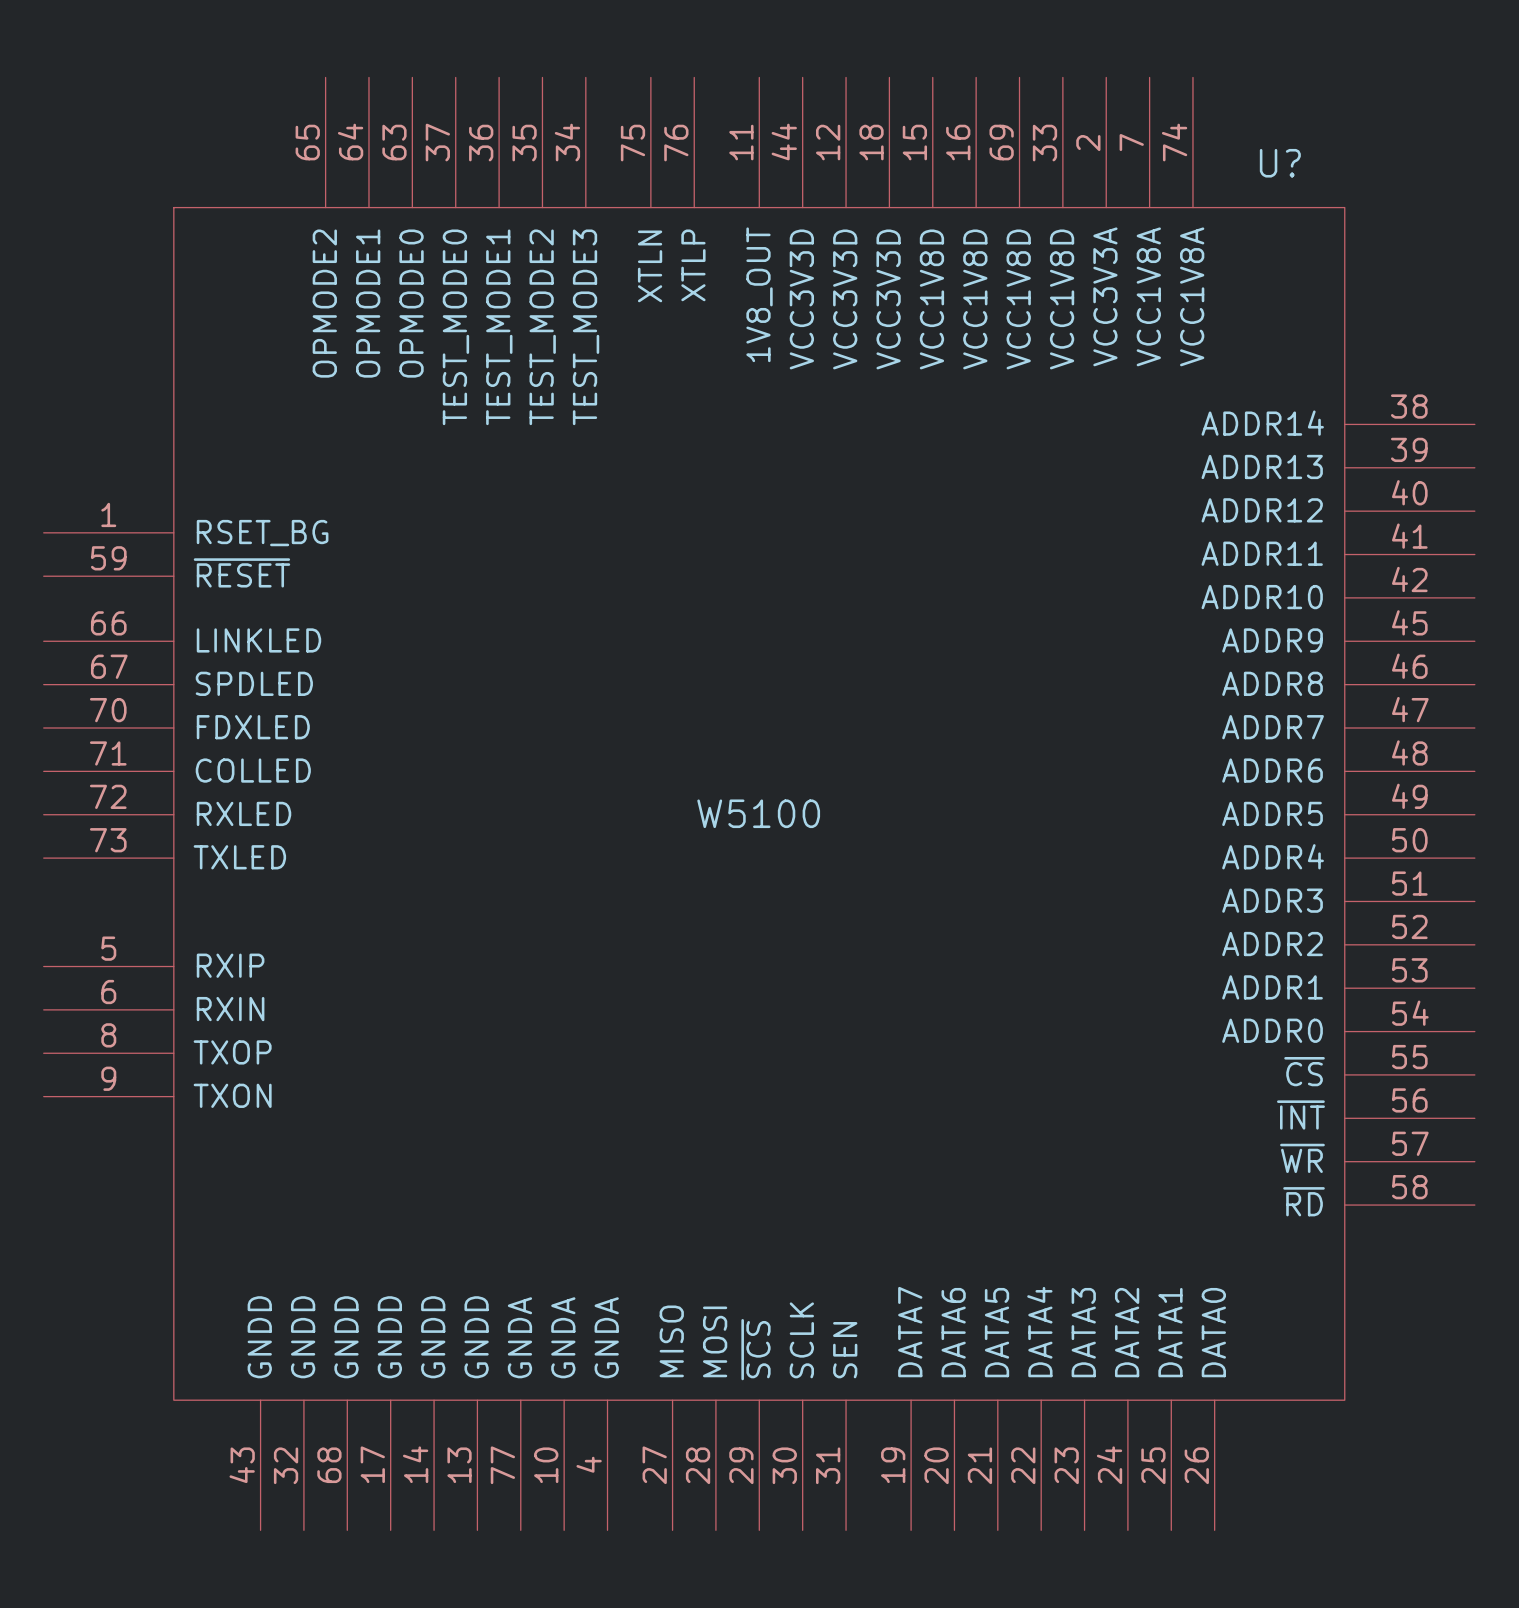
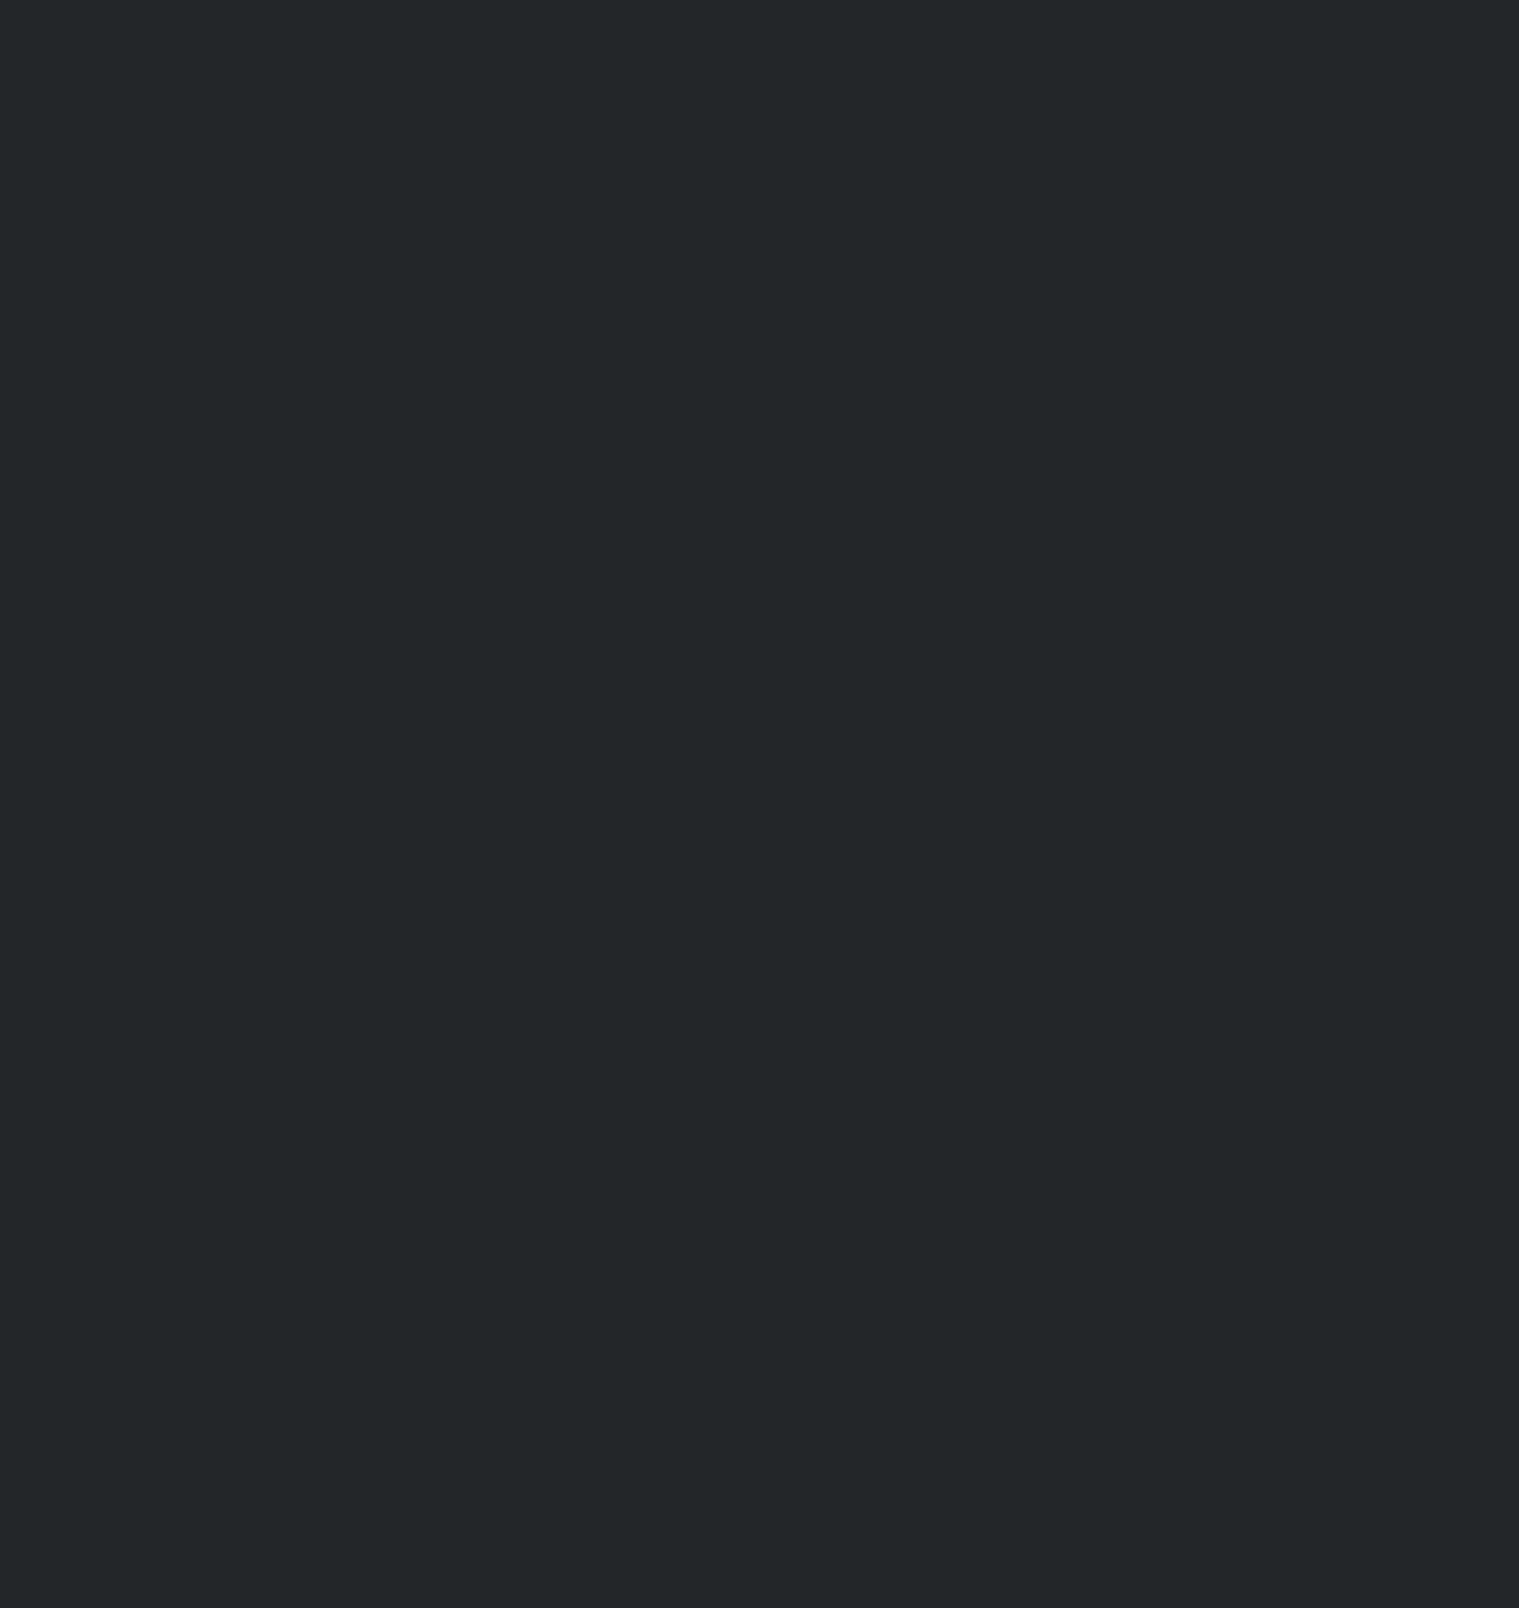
U?: W5100 (759, 803) -> none

